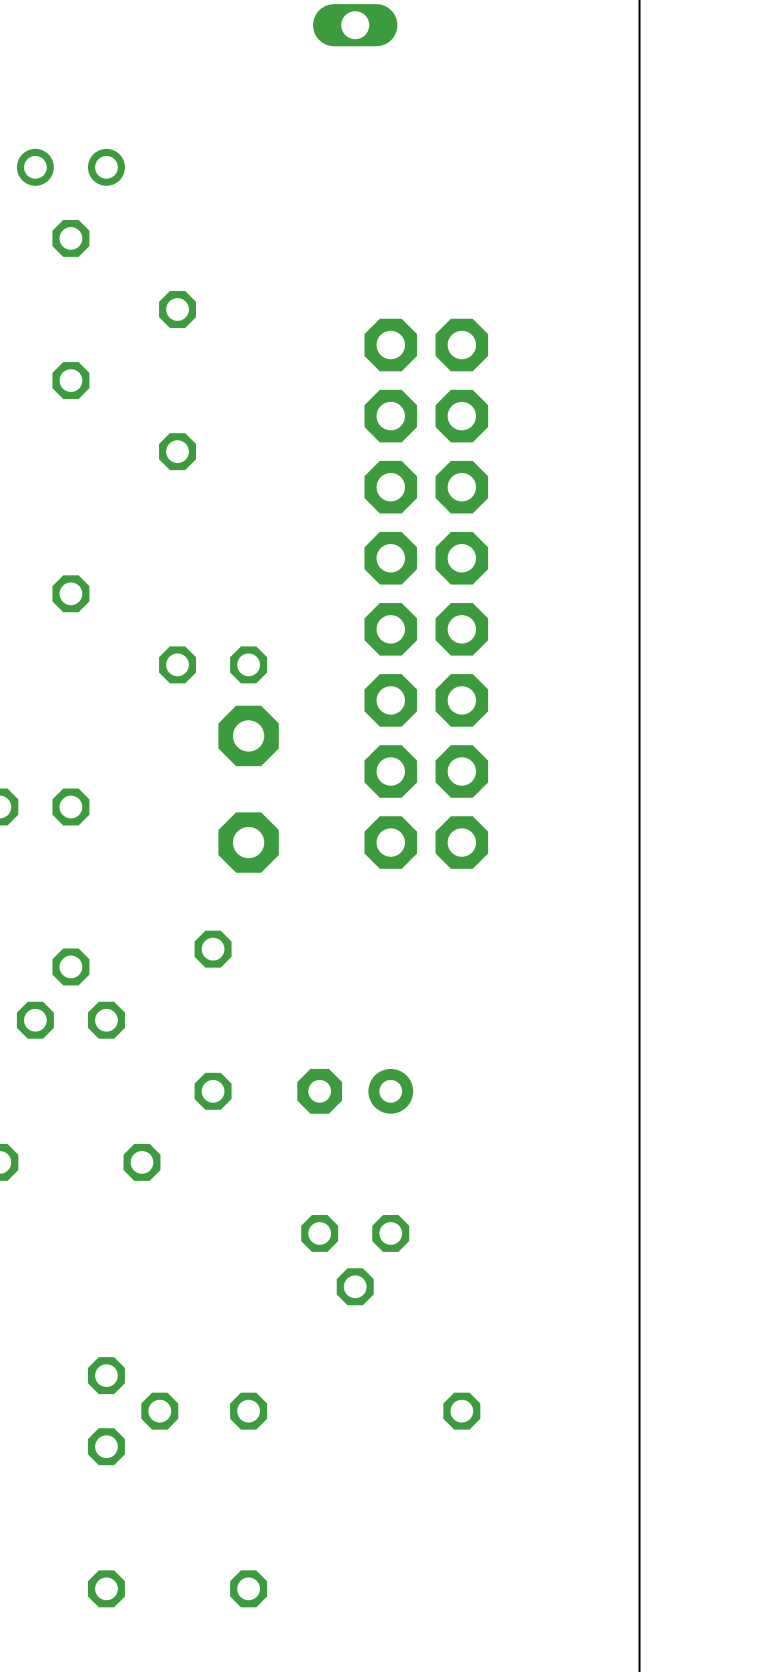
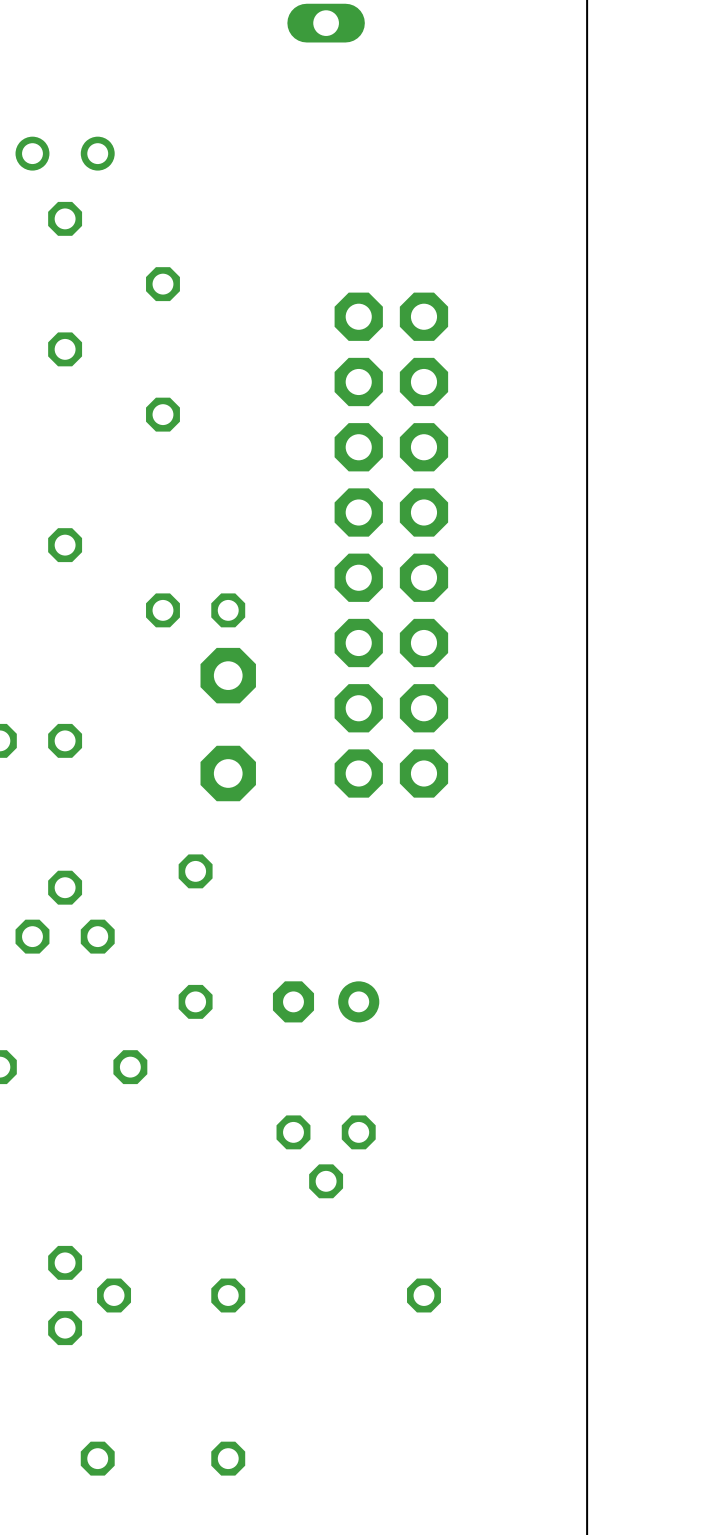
part position: (133, 1411) -> (89, 1295)

